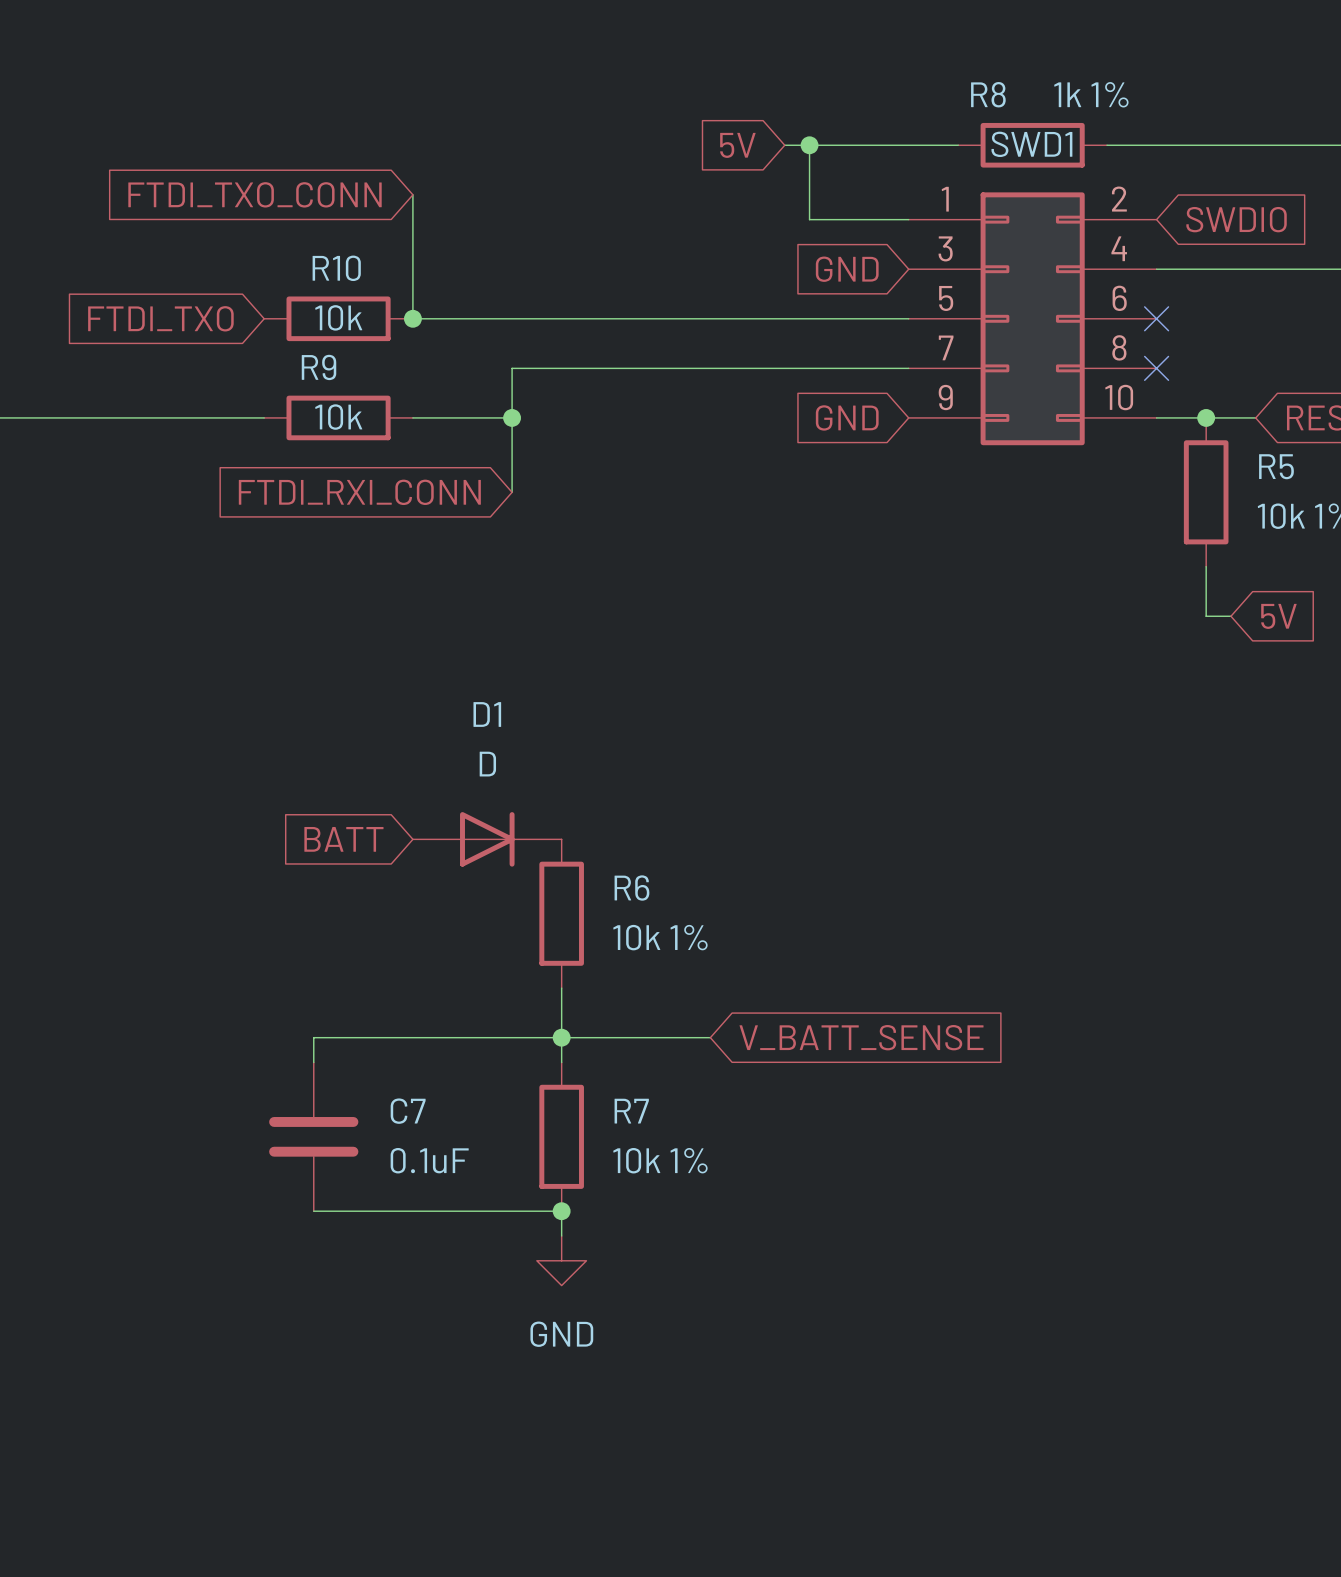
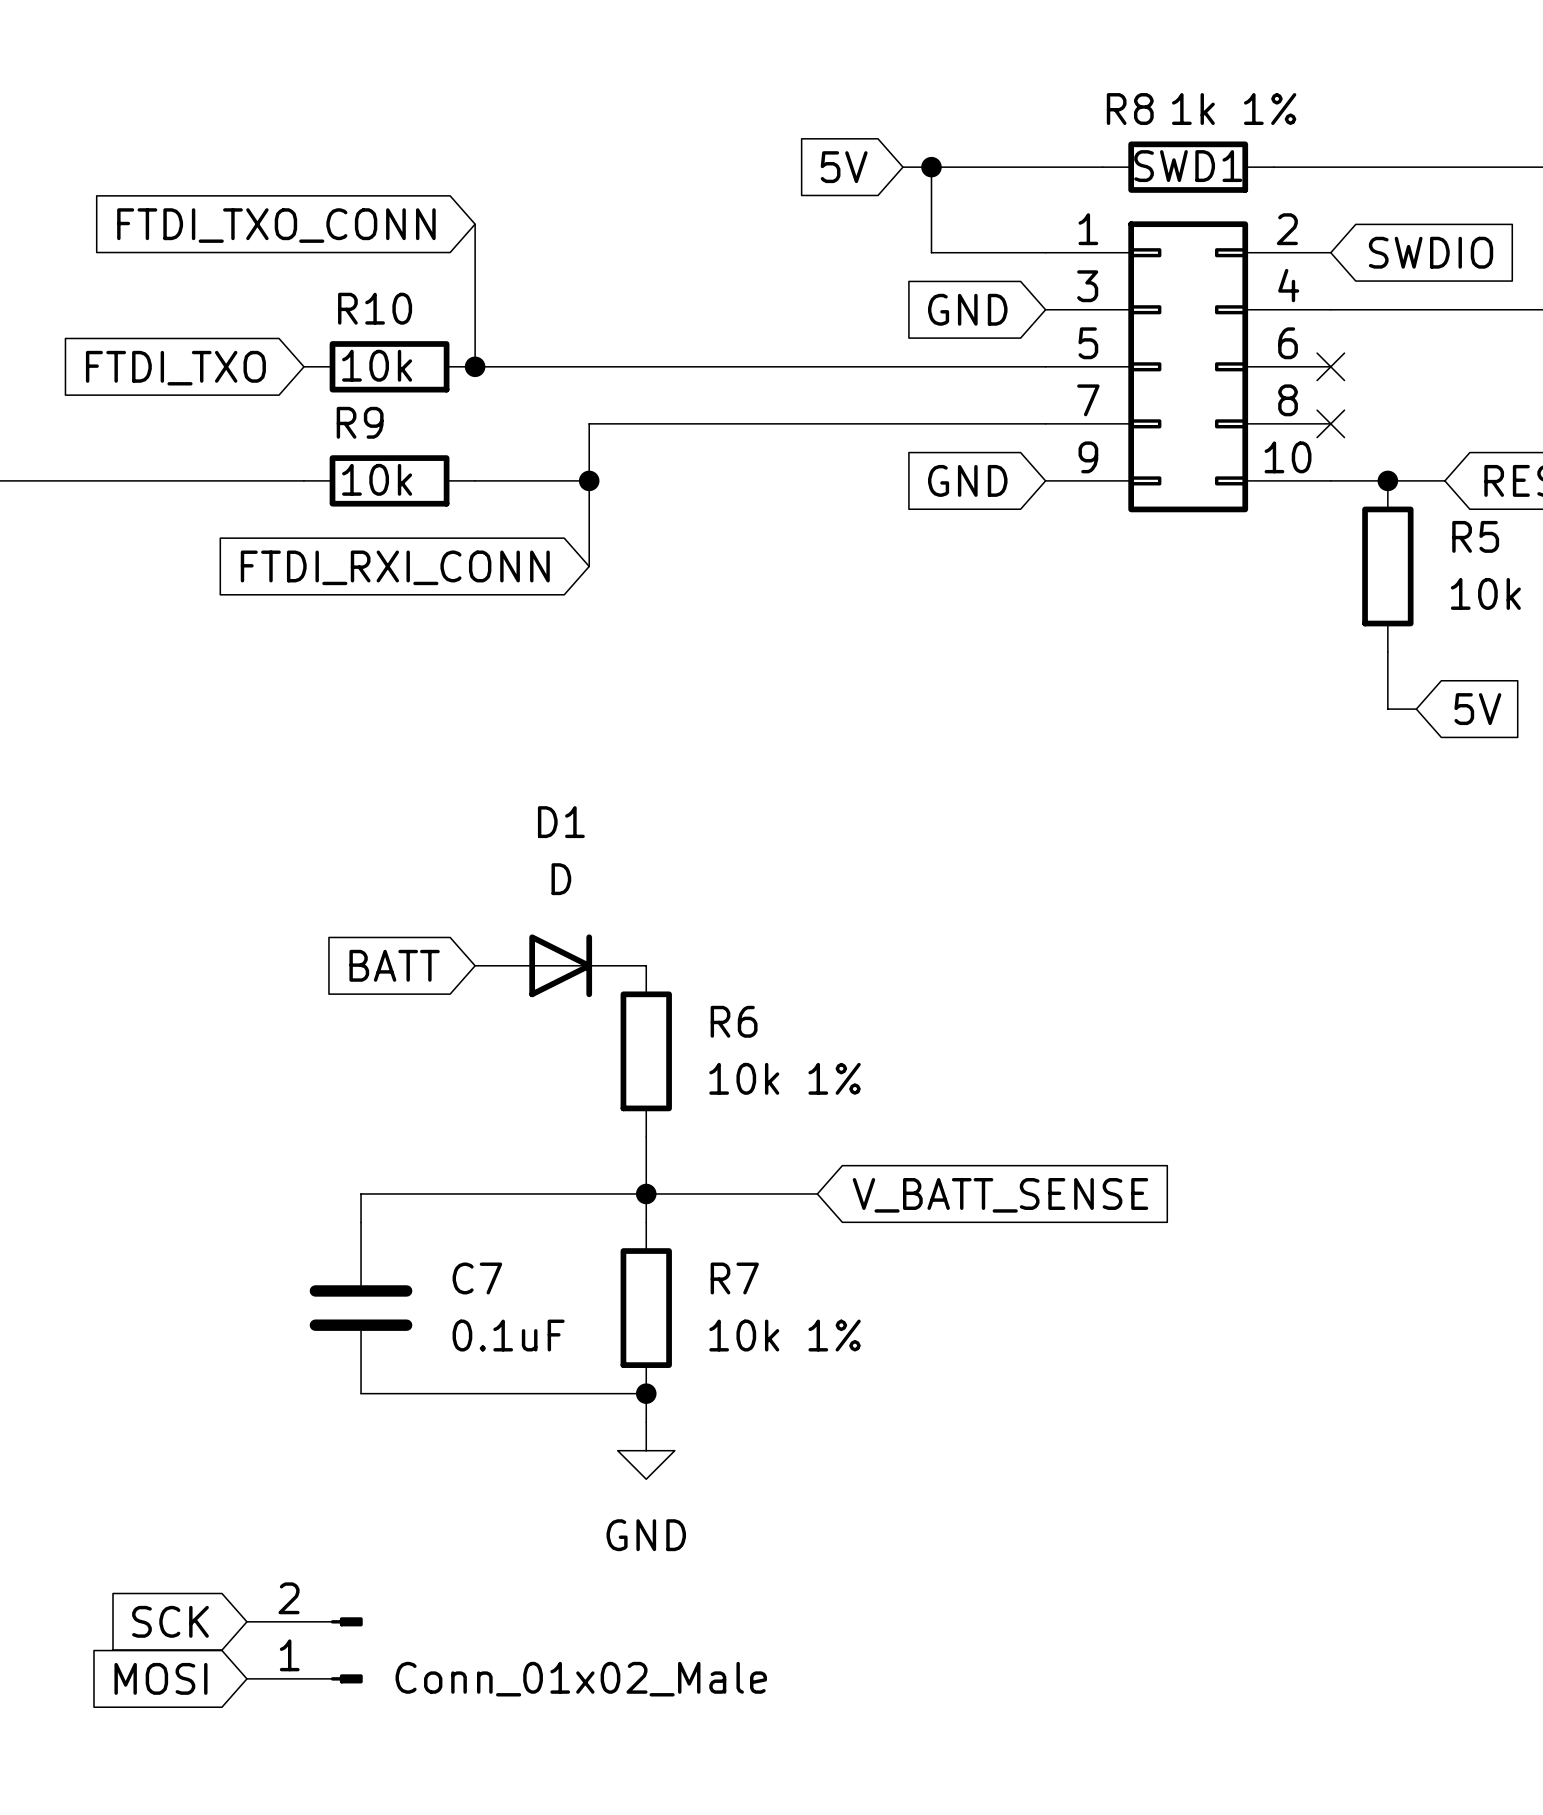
global label: none -> SCK (170, 1621)
part: none -> Conn_01x02_Male (304, 1650)
global label: none -> MOSI (160, 1678)

